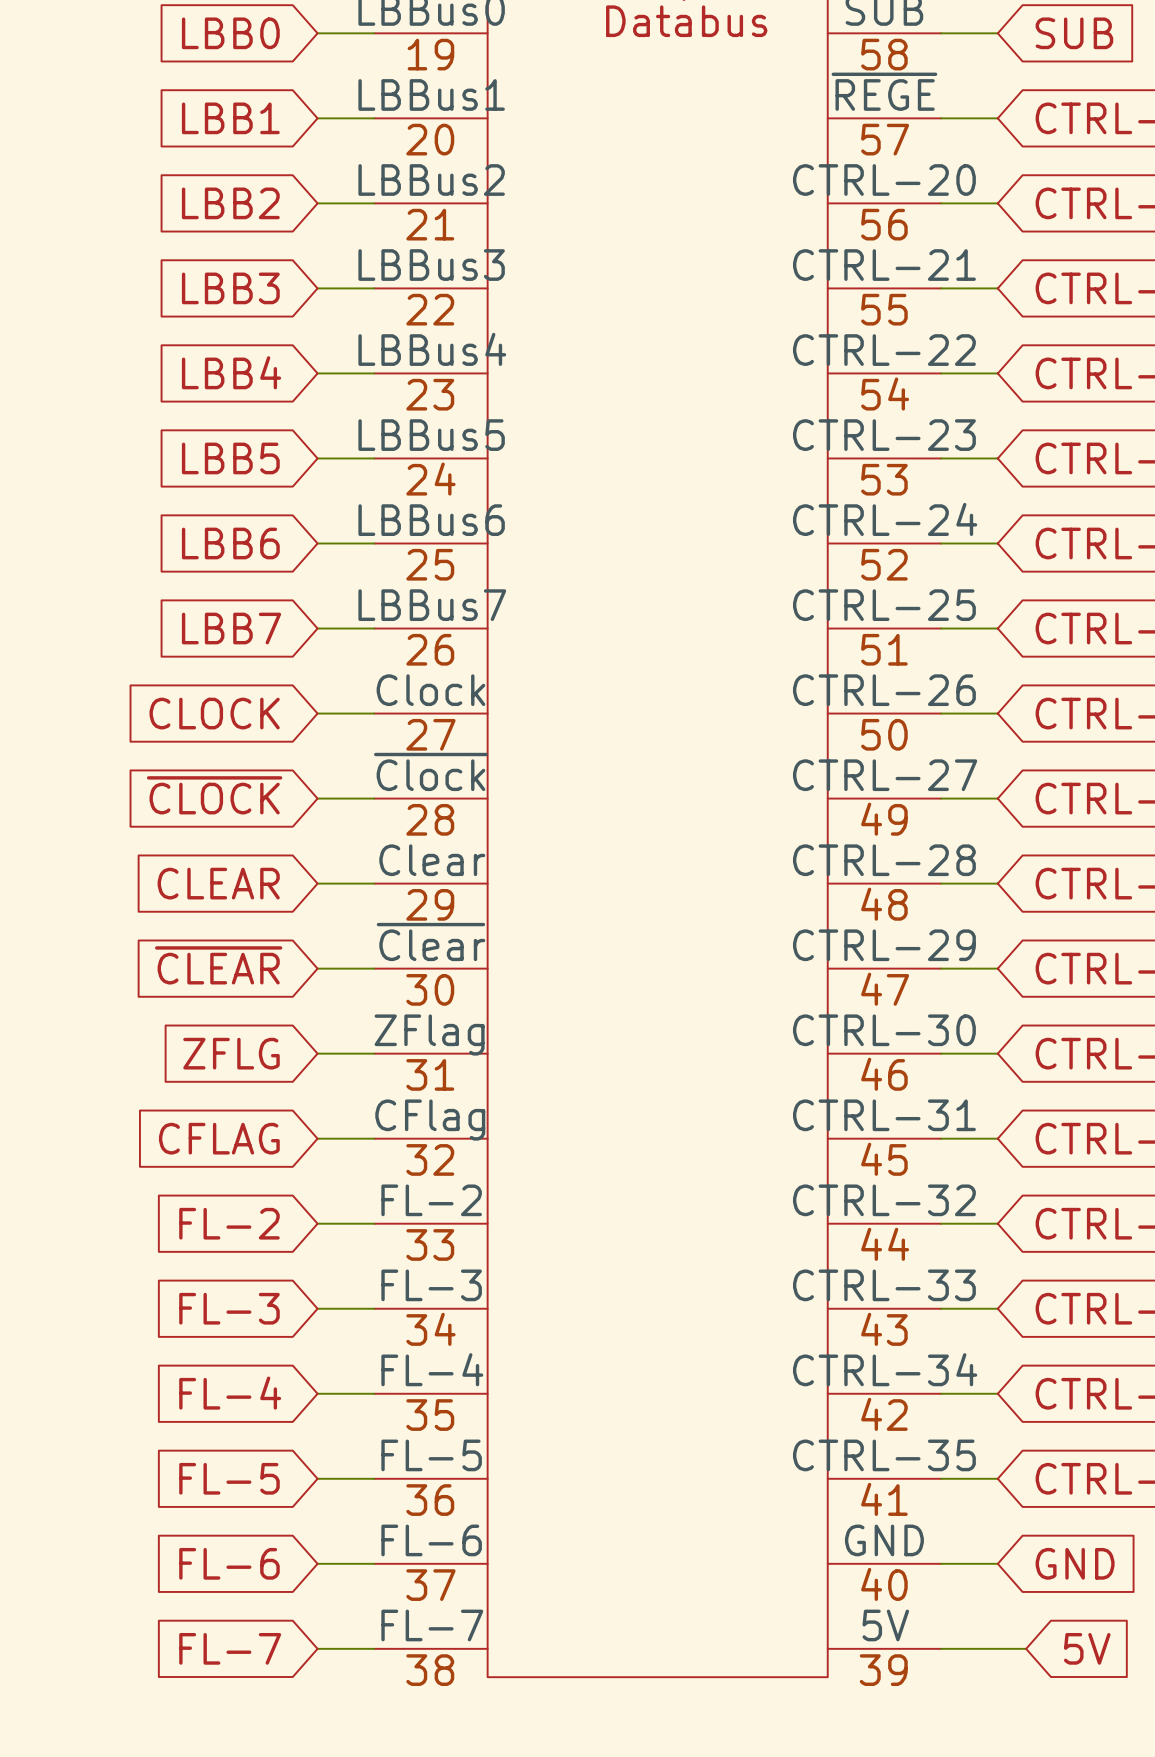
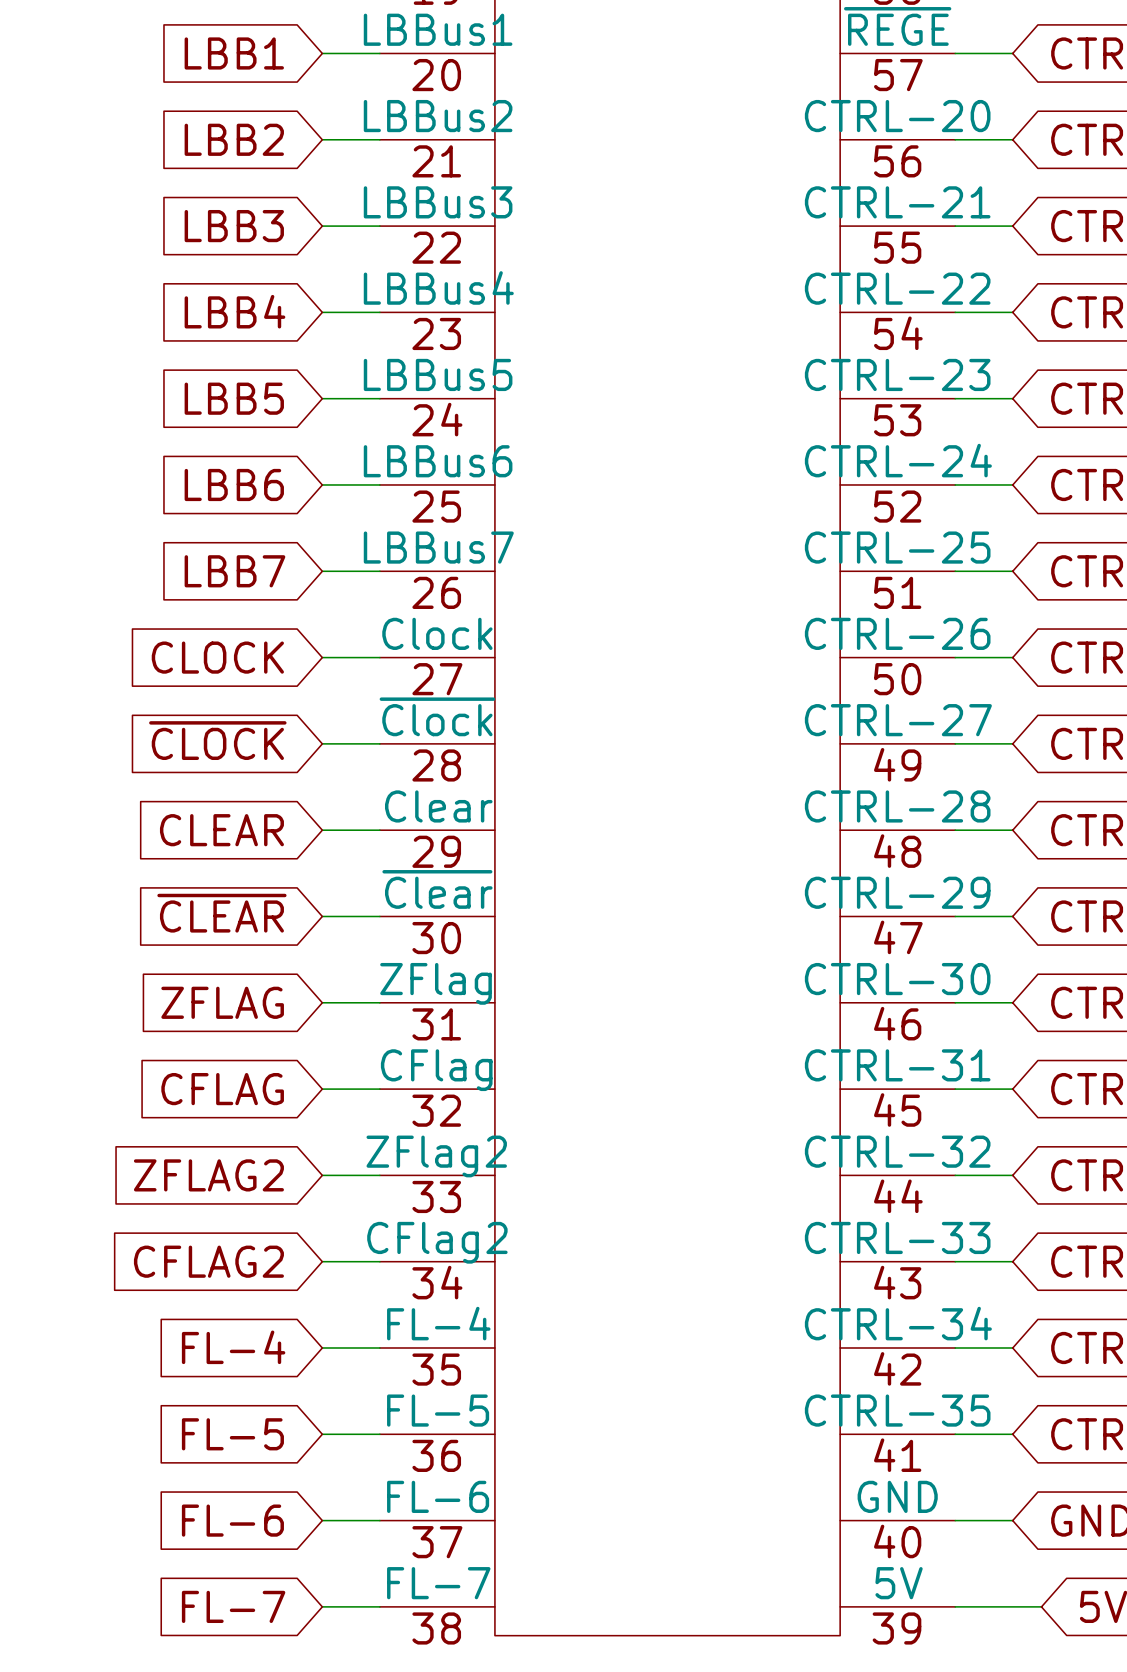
global label: ZFLG (231, 1053) -> ZFLAG (222, 1002)
part pin name: FL-2 (431, 1200) -> ZFlag2 (436, 1156)
global label: FL-2 (229, 1223) -> ZFLAG2 (208, 1175)
part pin name: FL-3 (431, 1285) -> CFlag2 (437, 1242)
global label: FL-3 (229, 1308) -> CFLAG2 (208, 1261)

